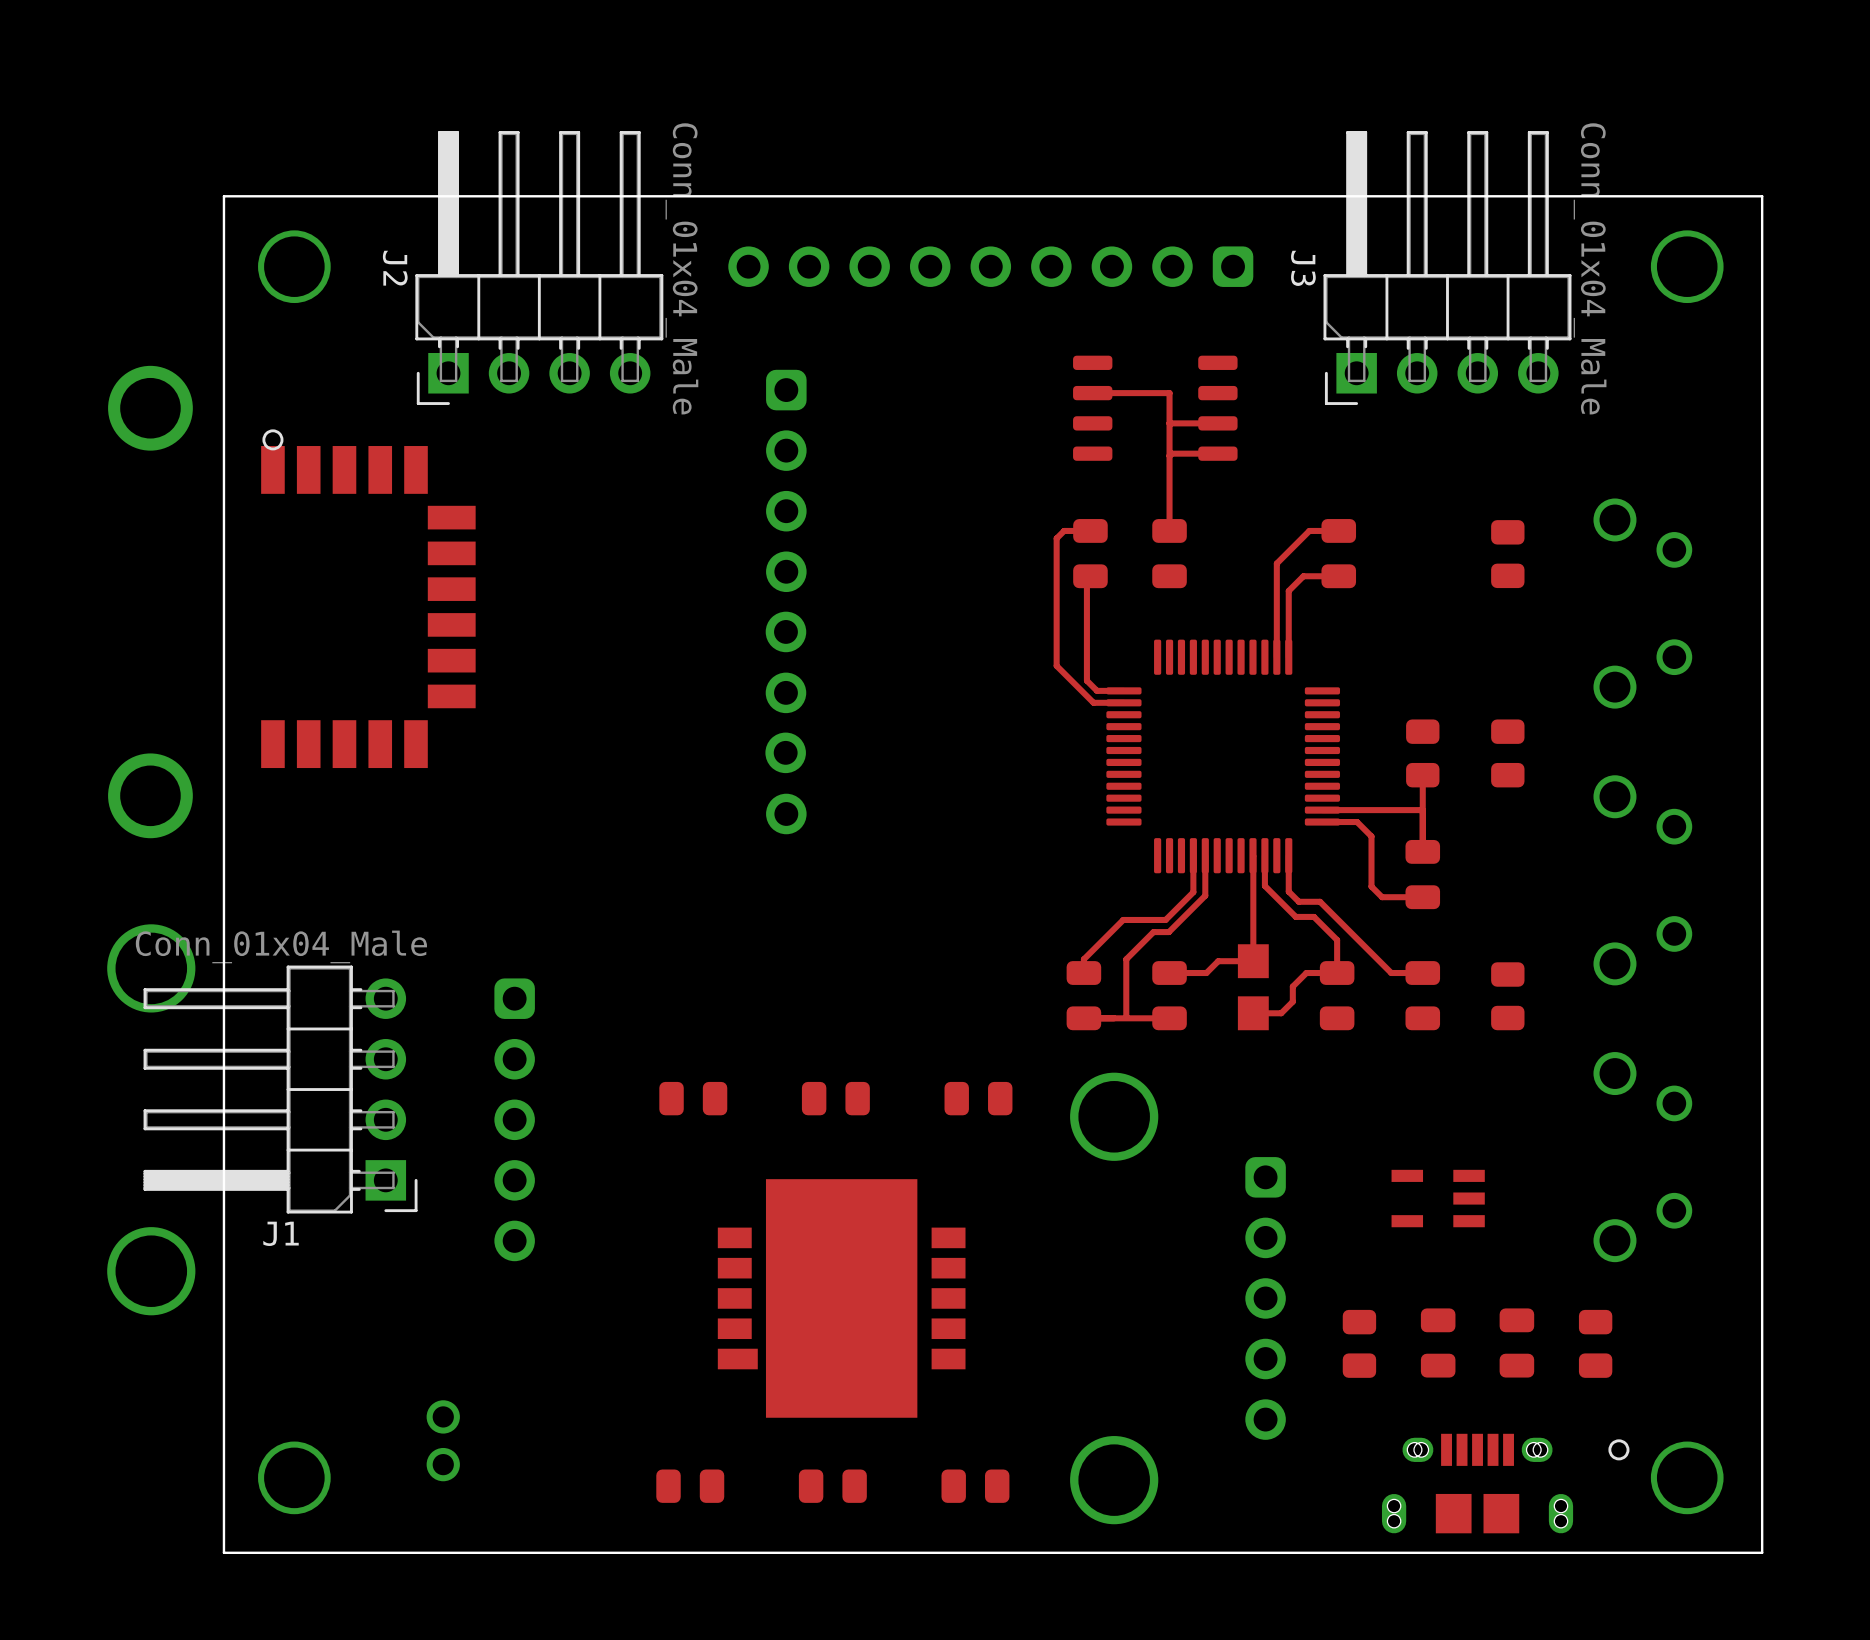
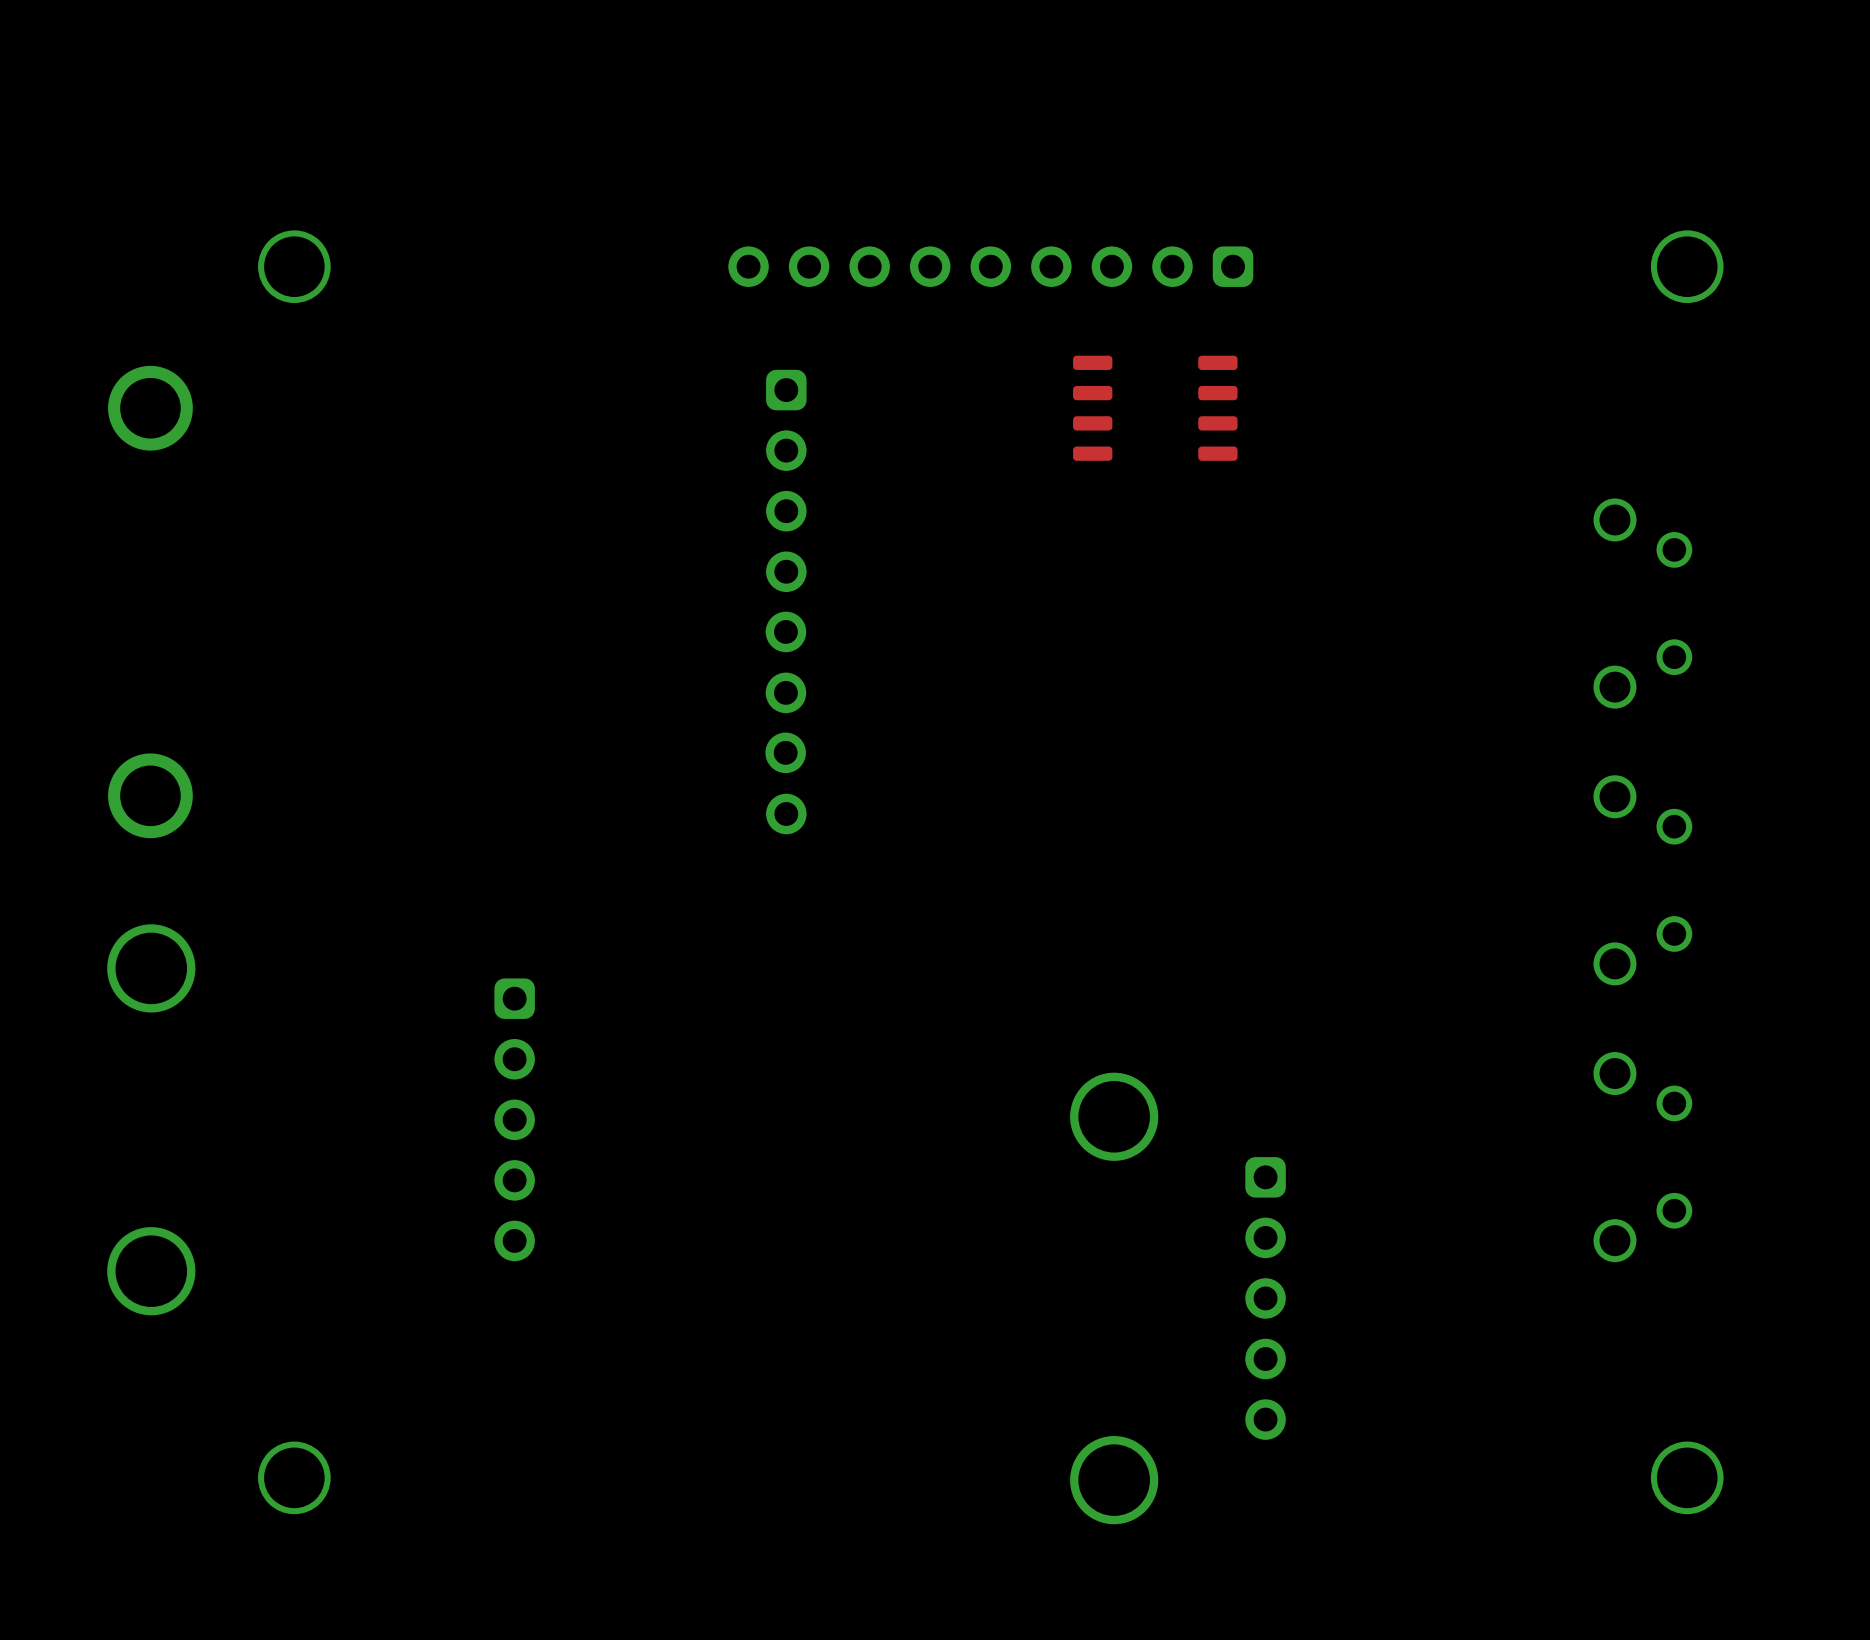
board edge: (1762, 196) (223, 196) (223, 1552) (1762, 1552) (1762, 196) -> none
J2: Conn_01x04_Male (539, 268) -> none
J3: Conn_01x04_Male (1447, 268) -> none
top track: (1092, 393) (1169, 393) (1169, 530) -> none
top track: (1217, 423) (1169, 423) -> none
top track: (1217, 453) (1171, 453) (1169, 455) -> none
top track: (1090, 530) (1064, 530) (1056, 538) (1056, 665) (1093, 702) (1123, 702) -> none
top track: (1338, 530) (1309, 530) (1276, 563) (1276, 657) -> none
part: (1090, 553) -> none
part: (1169, 553) -> none
part: (1338, 553) -> none
part: (1507, 554) -> none
top track: (1090, 576) (1086, 579) (1086, 680) (1097, 690) (1123, 690) -> none
top track: (1338, 576) (1303, 576) (1288, 590) (1288, 657) -> none
part: (368, 598) -> none
part: (1422, 753) -> none
part: (1507, 753) -> none
part: (1223, 756) -> none
top track: (1422, 775) (1422, 851) -> none
top track: (1422, 810) (1322, 810) -> none
top track: (1322, 822) (1357, 822) (1371, 836) (1371, 886) (1382, 897) (1422, 897) -> none
top track: (1193, 855) (1193, 892) (1165, 919) (1123, 919) (1083, 959) (1083, 973) -> none
top track: (1205, 855) (1205, 895) (1168, 932) (1153, 932) (1126, 959) (1126, 1017) -> none
top track: (1252, 855) (1253, 961) (1218, 961) (1206, 973) (1169, 973) -> none
top track: (1264, 855) (1264, 885) (1295, 916) (1314, 916) (1337, 940) (1337, 973) (1306, 973) (1292, 986) (1292, 1001) (1281, 1013) (1253, 1013) -> none
top track: (1288, 855) (1288, 891) (1298, 901) (1320, 901) (1391, 973) (1422, 973) -> none
part: (1422, 874) -> none
part: (1253, 987) -> none
part: (1083, 995) -> none
part: (1169, 995) -> none
part: (1337, 995) -> none
part: (1422, 995) -> none
part: (1507, 996) -> none
top track: (1169, 1018) (1083, 1018) -> none
J1: Conn_01x04_Male (280, 1089) -> none
part: (693, 1098) -> none
part: (835, 1098) -> none
part: (978, 1098) -> none
part: (1438, 1198) -> none
part: (841, 1298) -> none
part: (1438, 1342) -> none
part: (1516, 1342) -> none
part: (1359, 1343) -> none
part: (1595, 1343) -> none
part: (443, 1440) -> none
part: (1505, 1483) -> none
part: (690, 1486) -> none
part: (832, 1486) -> none
part: (975, 1486) -> none

